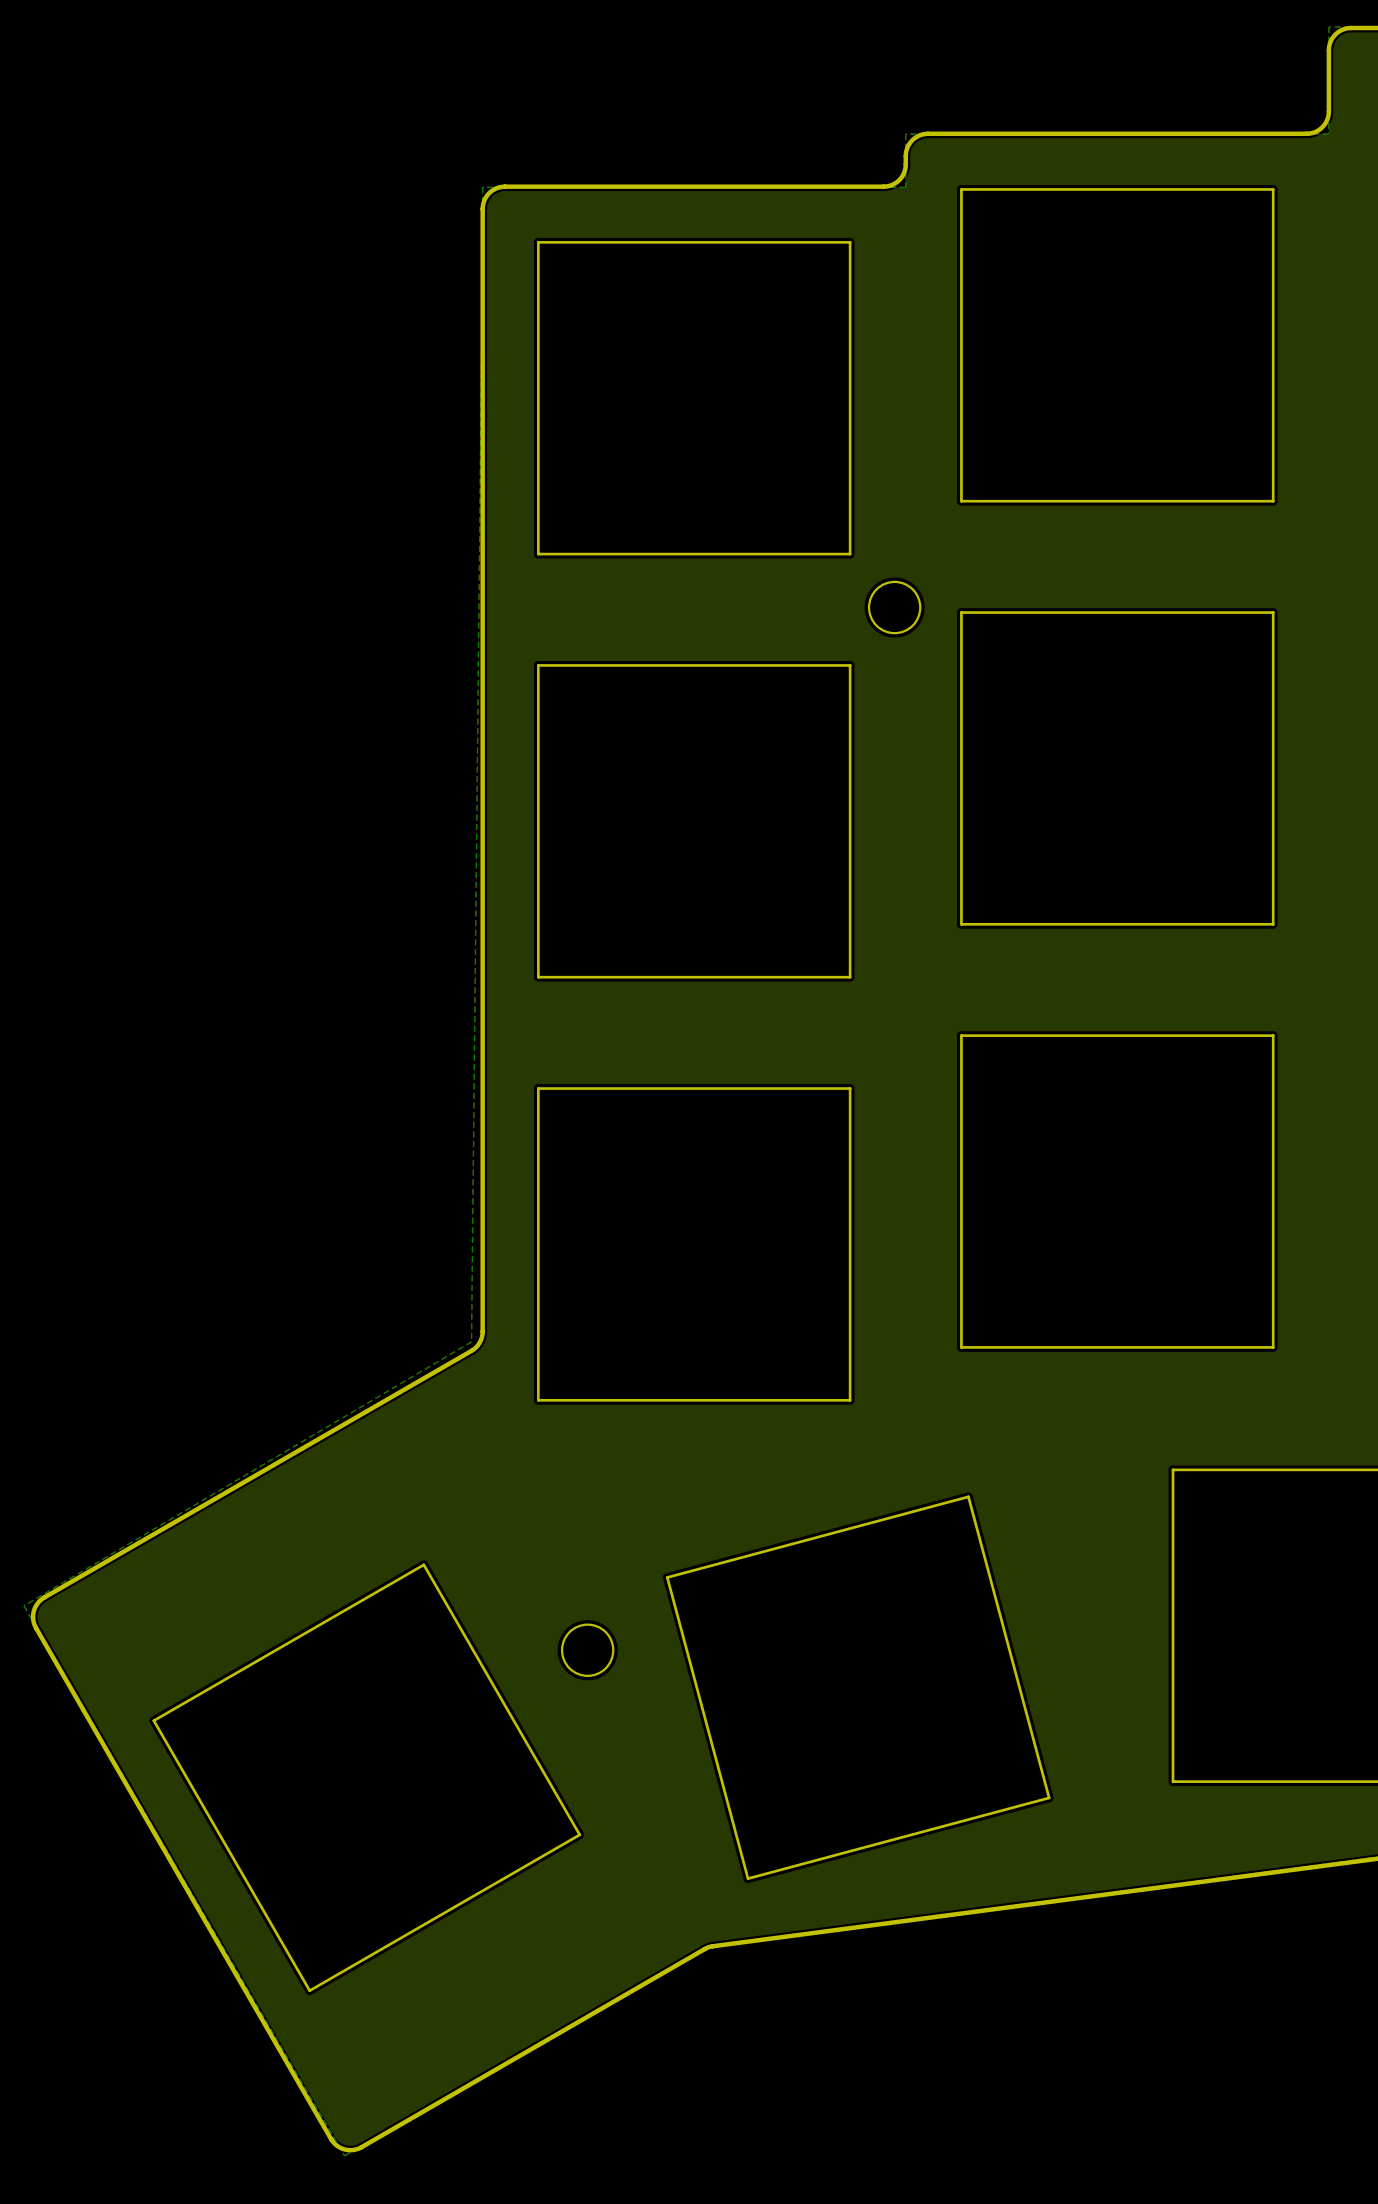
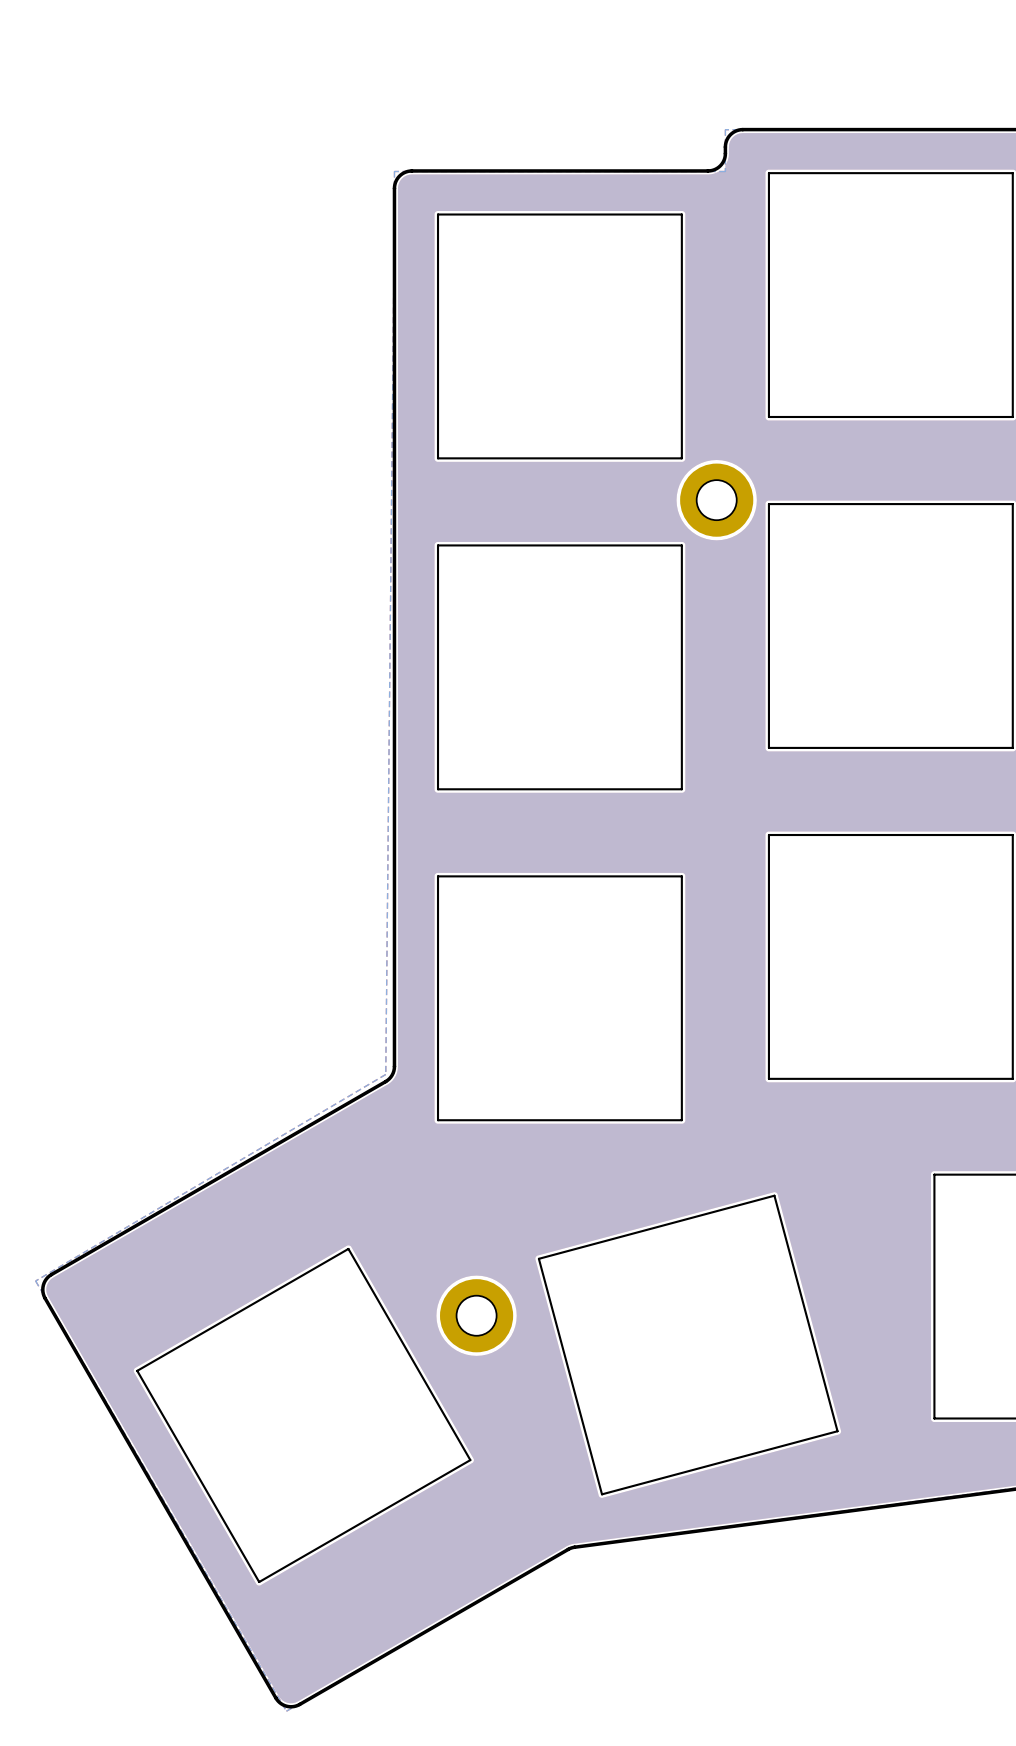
drawing: [867, 580, 922, 635] -> none
part: none -> (716, 500)
drawing: [560, 1623, 615, 1677] -> none
part: none -> (476, 1315)

